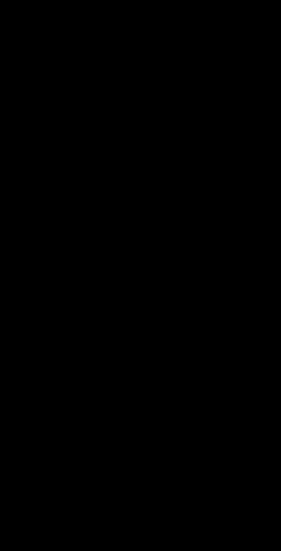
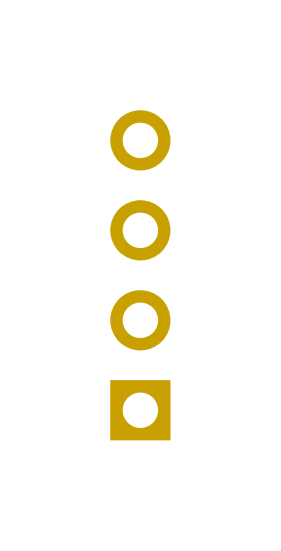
part: none -> (140, 275)

